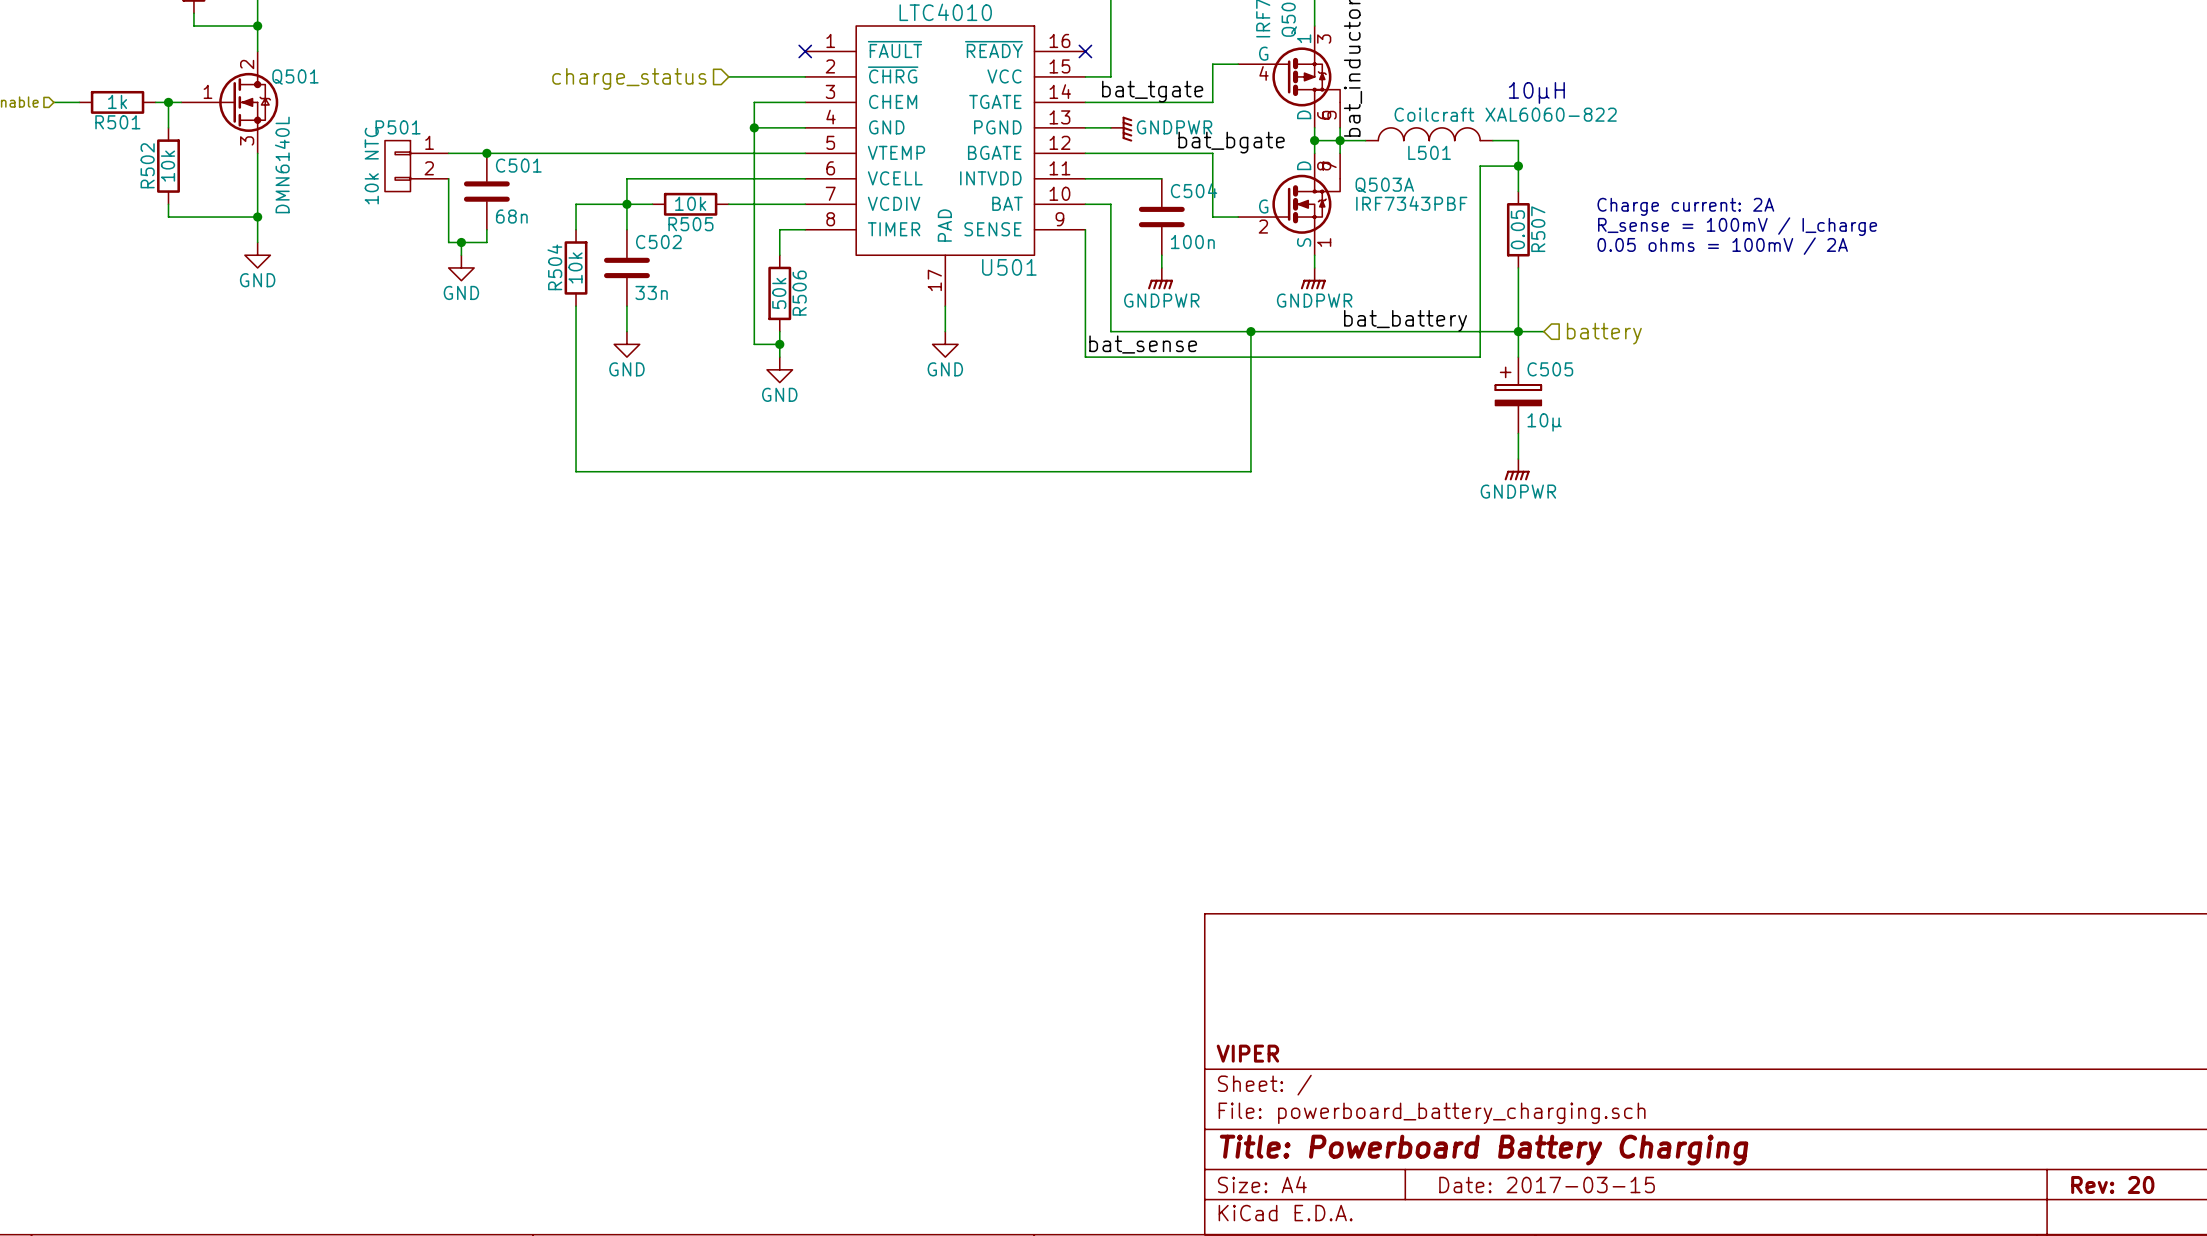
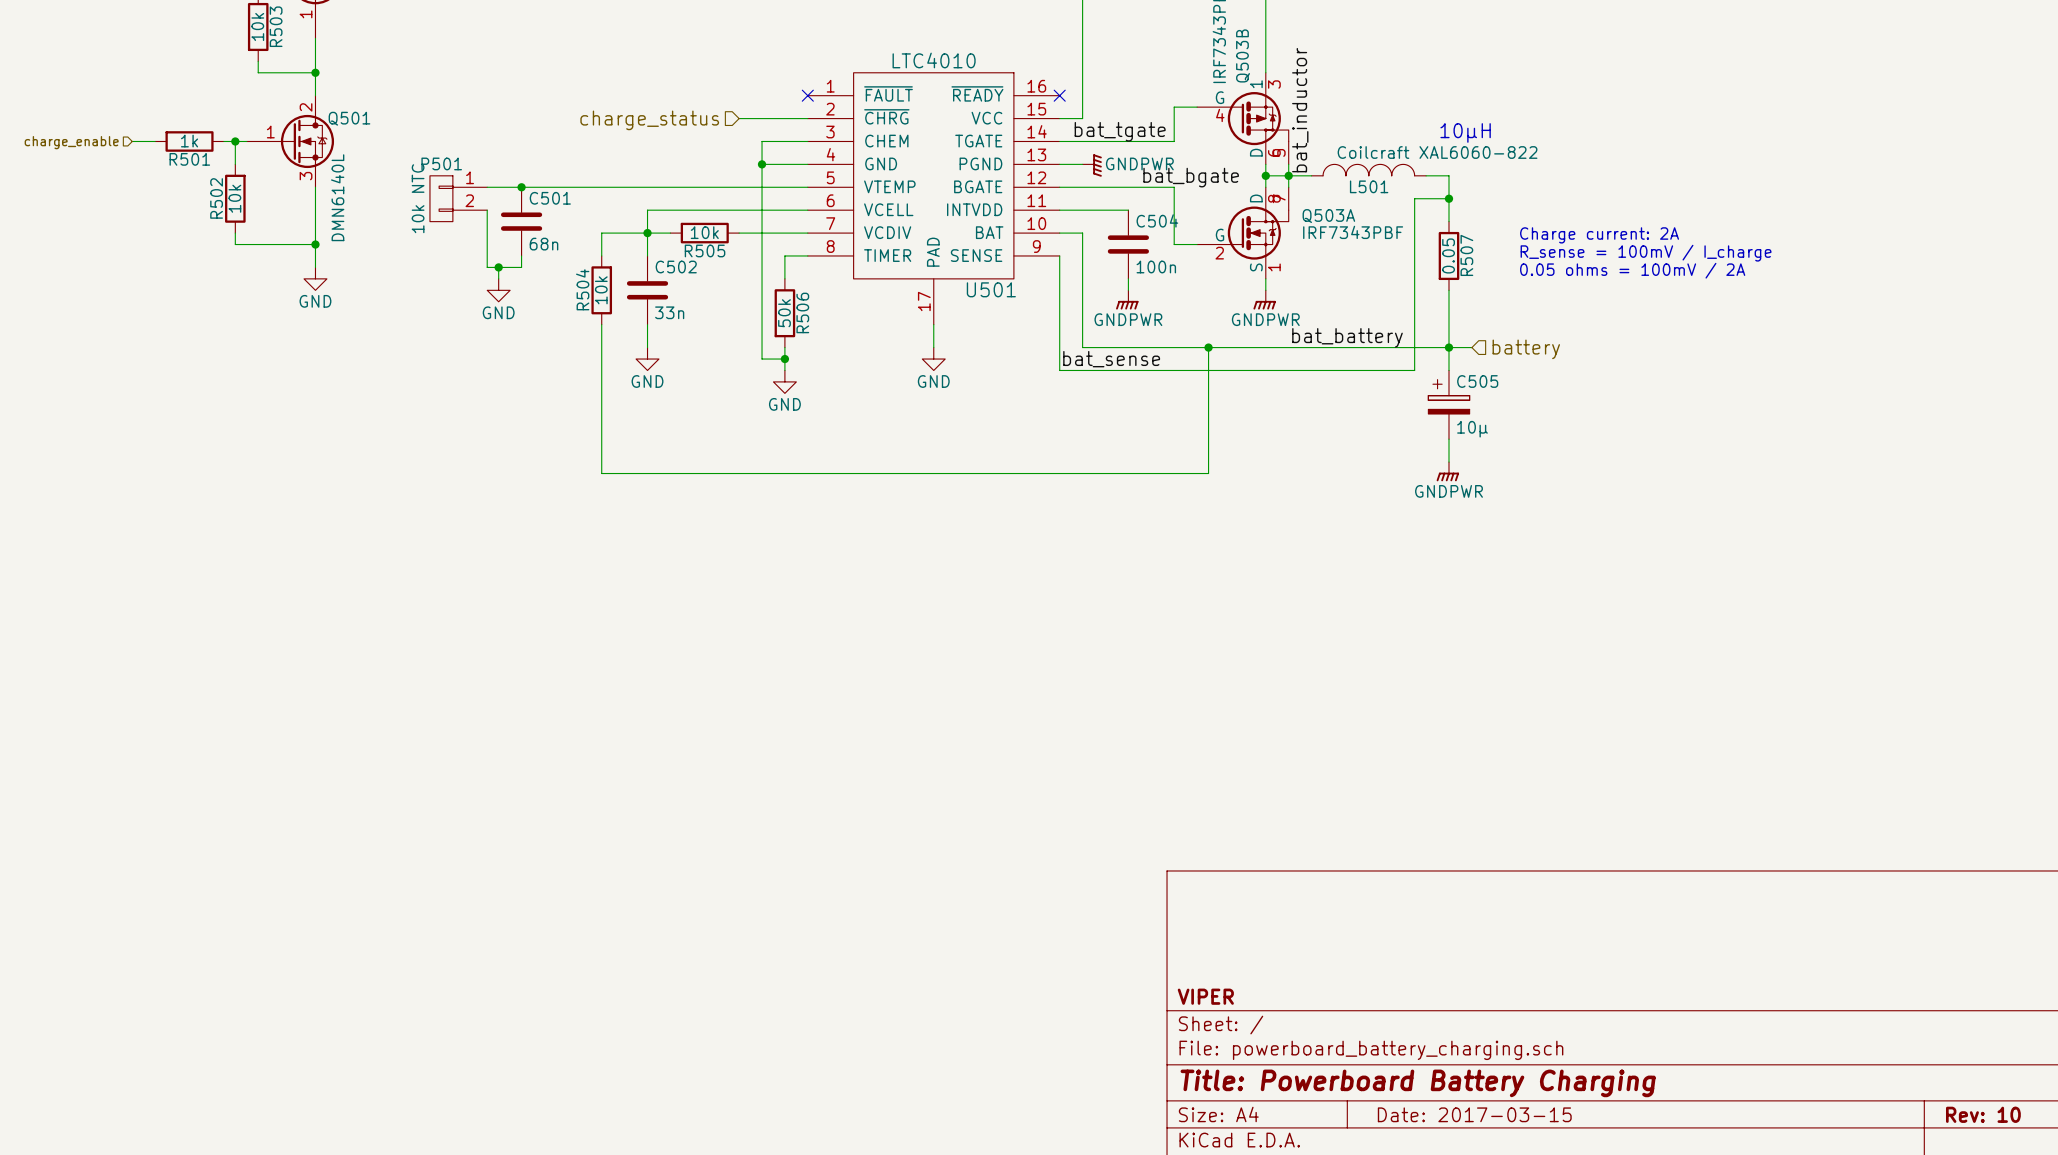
title block: Rev: 20 (2112, 1184) -> Rev: 10 (1983, 1114)

